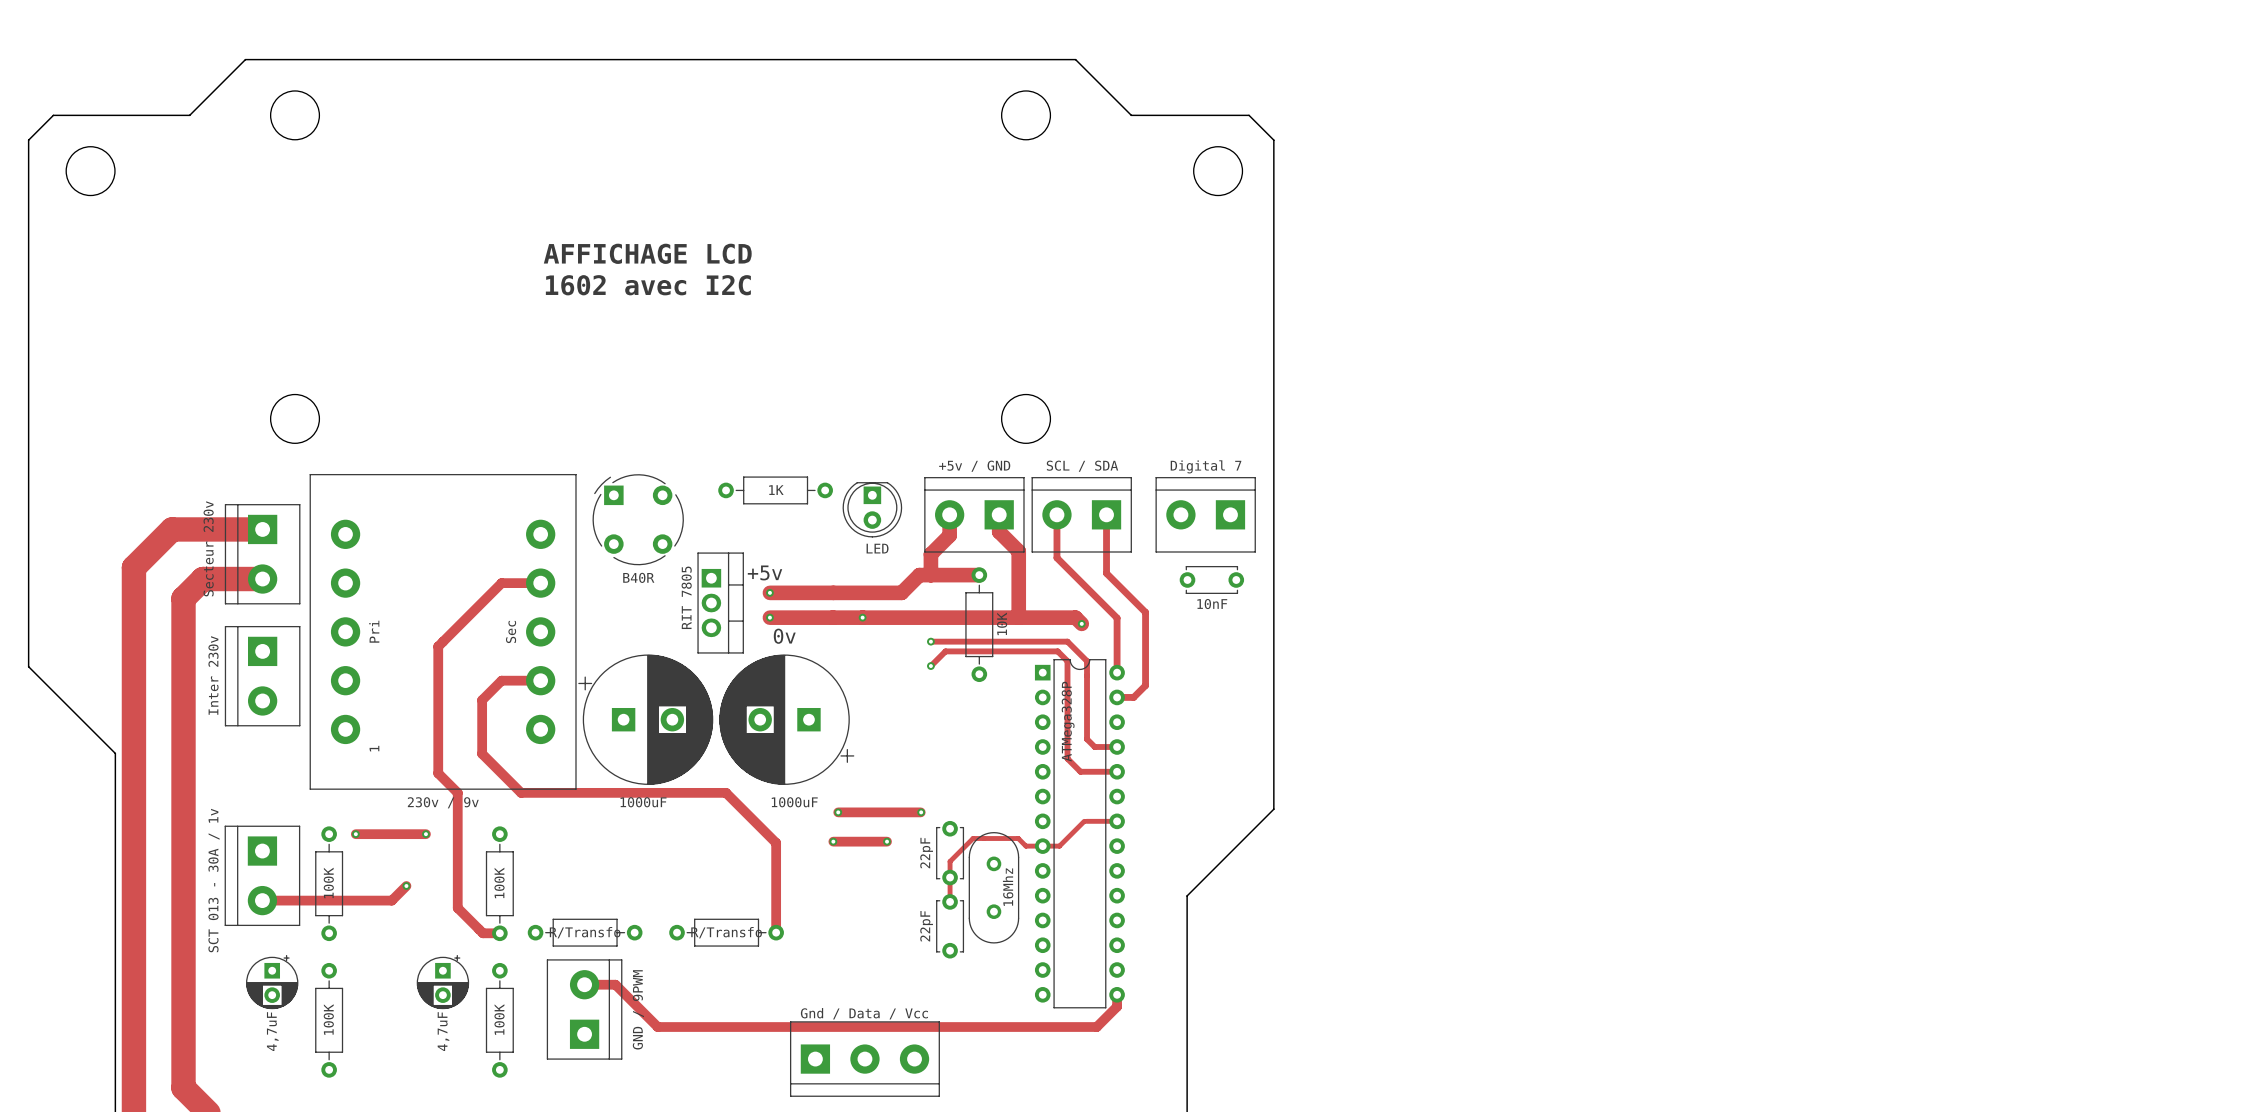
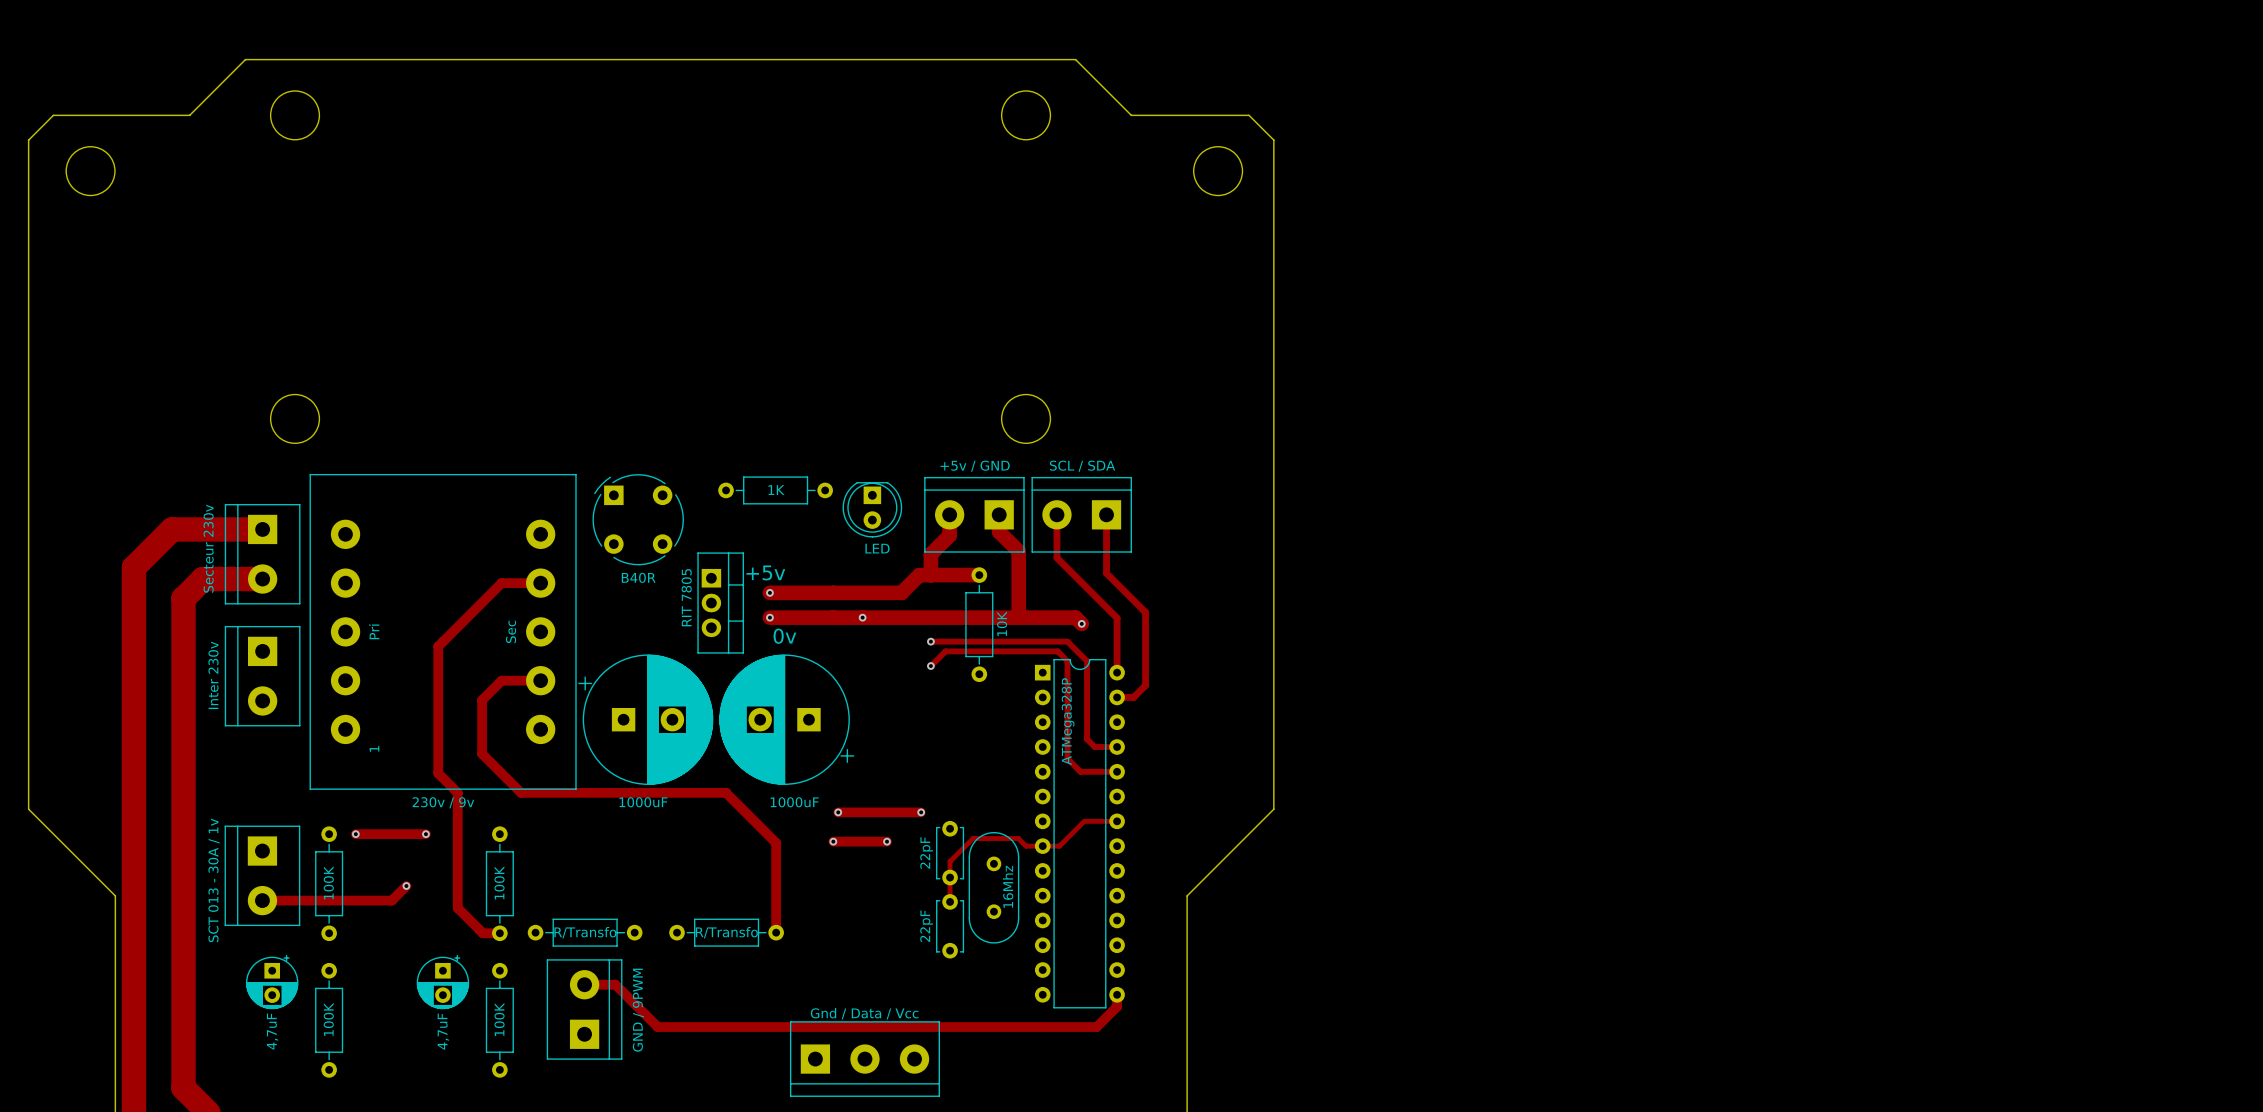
text: AFFICHAGE LCD (647, 253) -> none
text: 1602 avec I2C (648, 285) -> none
Digital 7: (1205, 514) -> none
10nF: (1211, 579) -> none
board edge: (28, 666) (115, 753) (115, 895) -> (28, 666) (28, 809) (115, 895)

